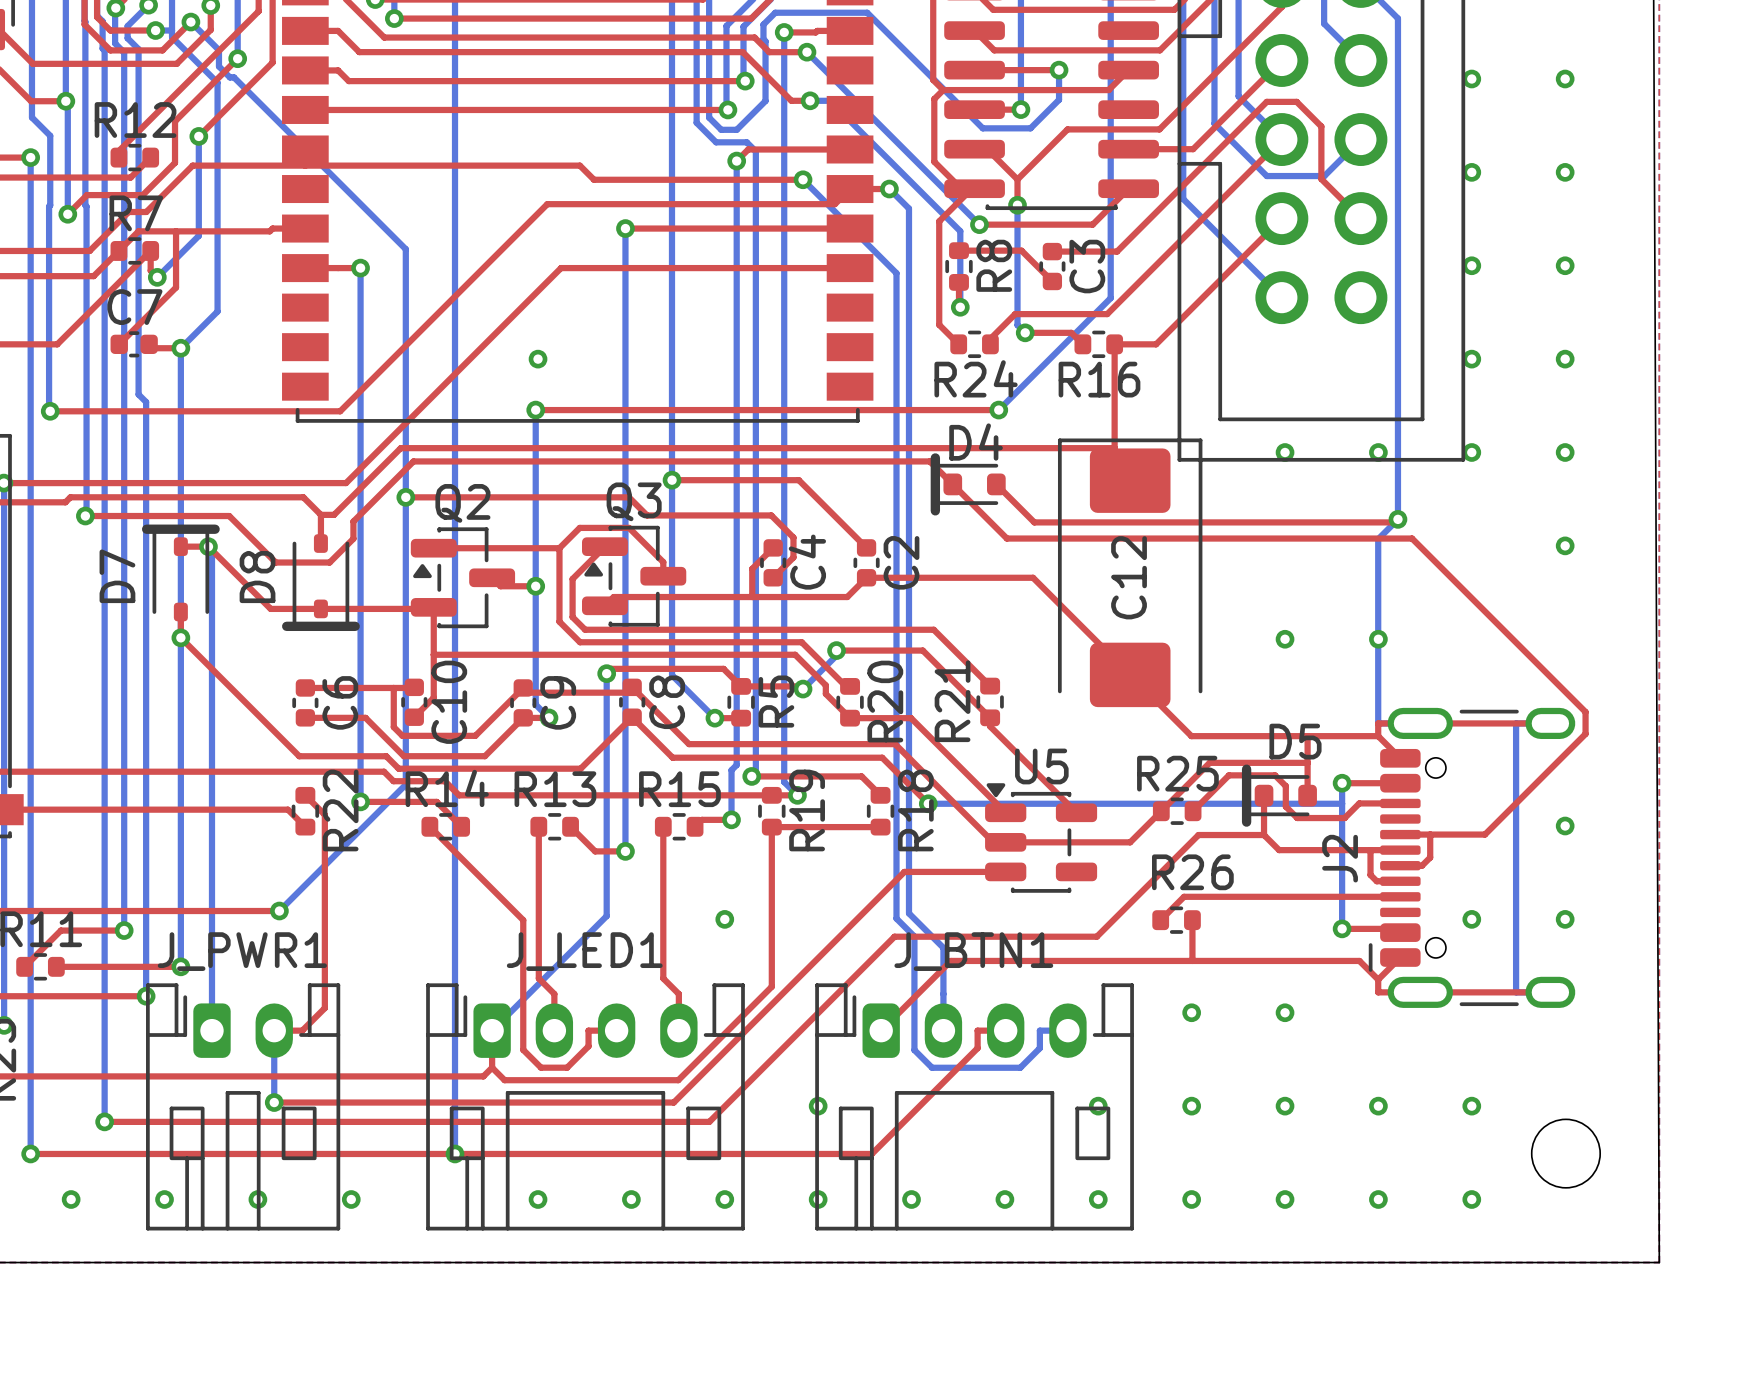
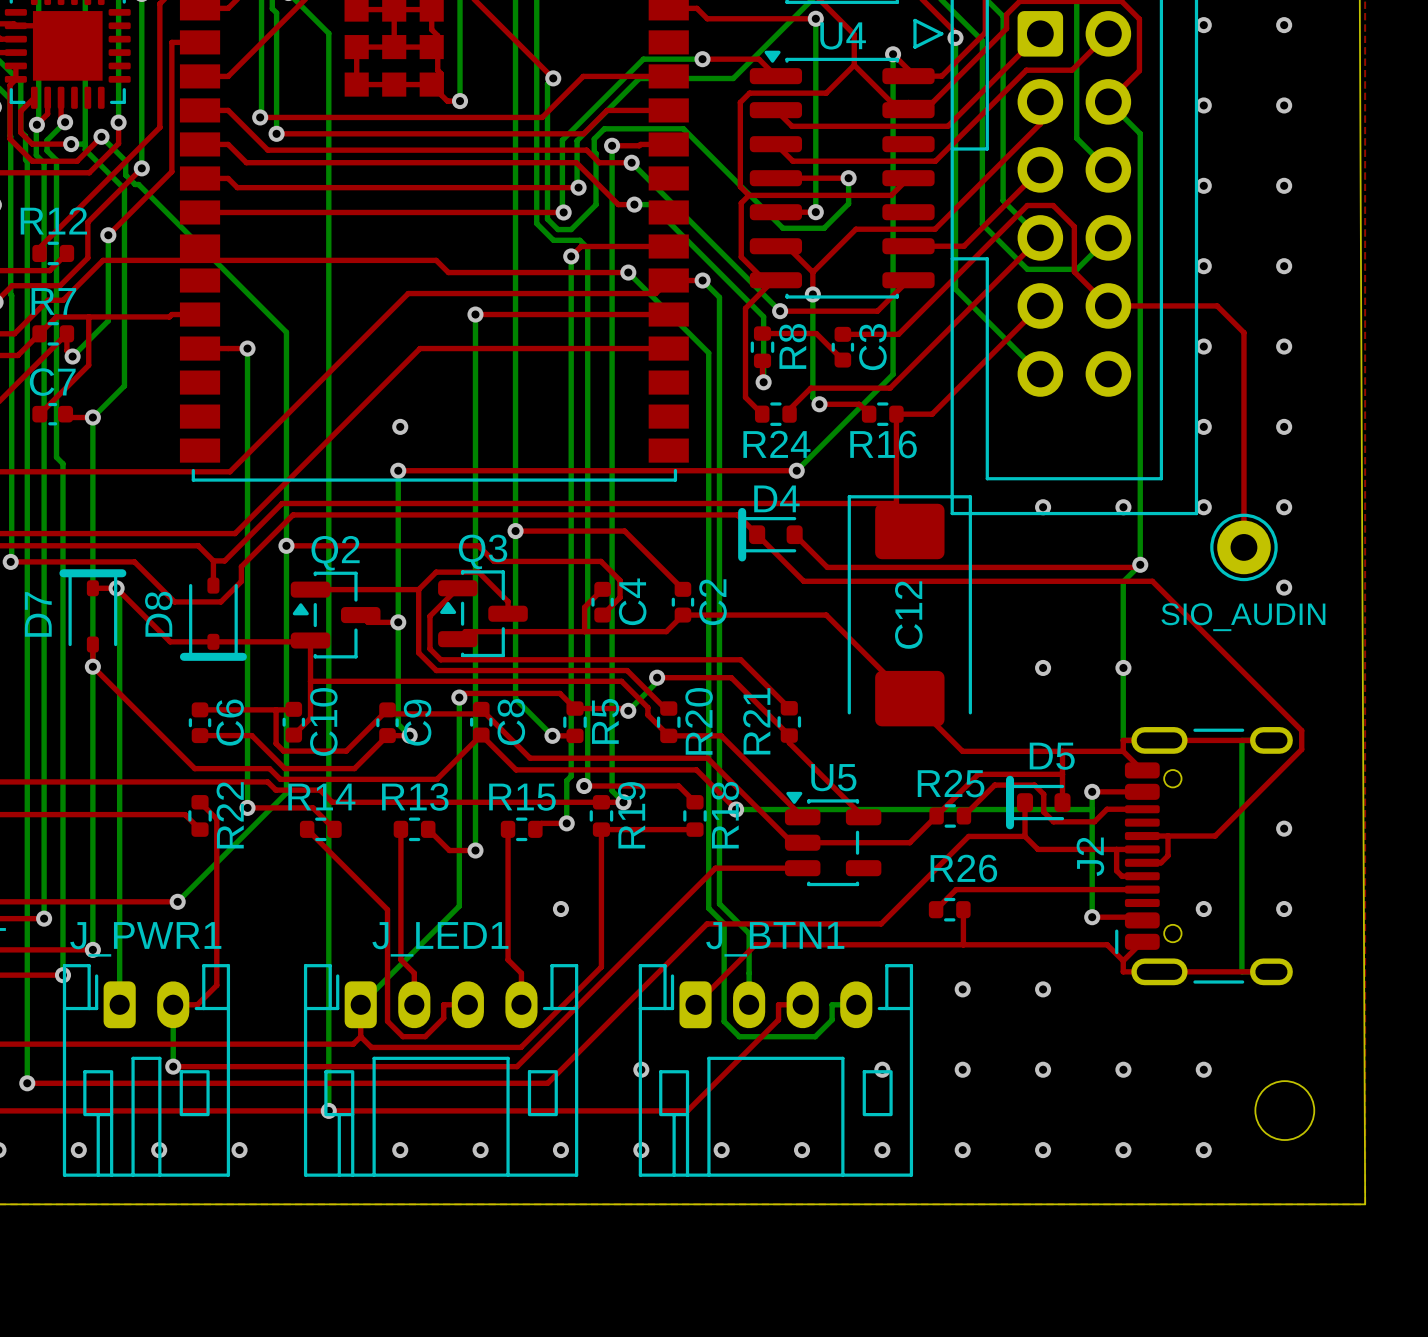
top track: none -> (1108, 305) (1217, 305) (1243, 332) (1243, 547)
part: none -> SIO_AUDIN (1243, 547)

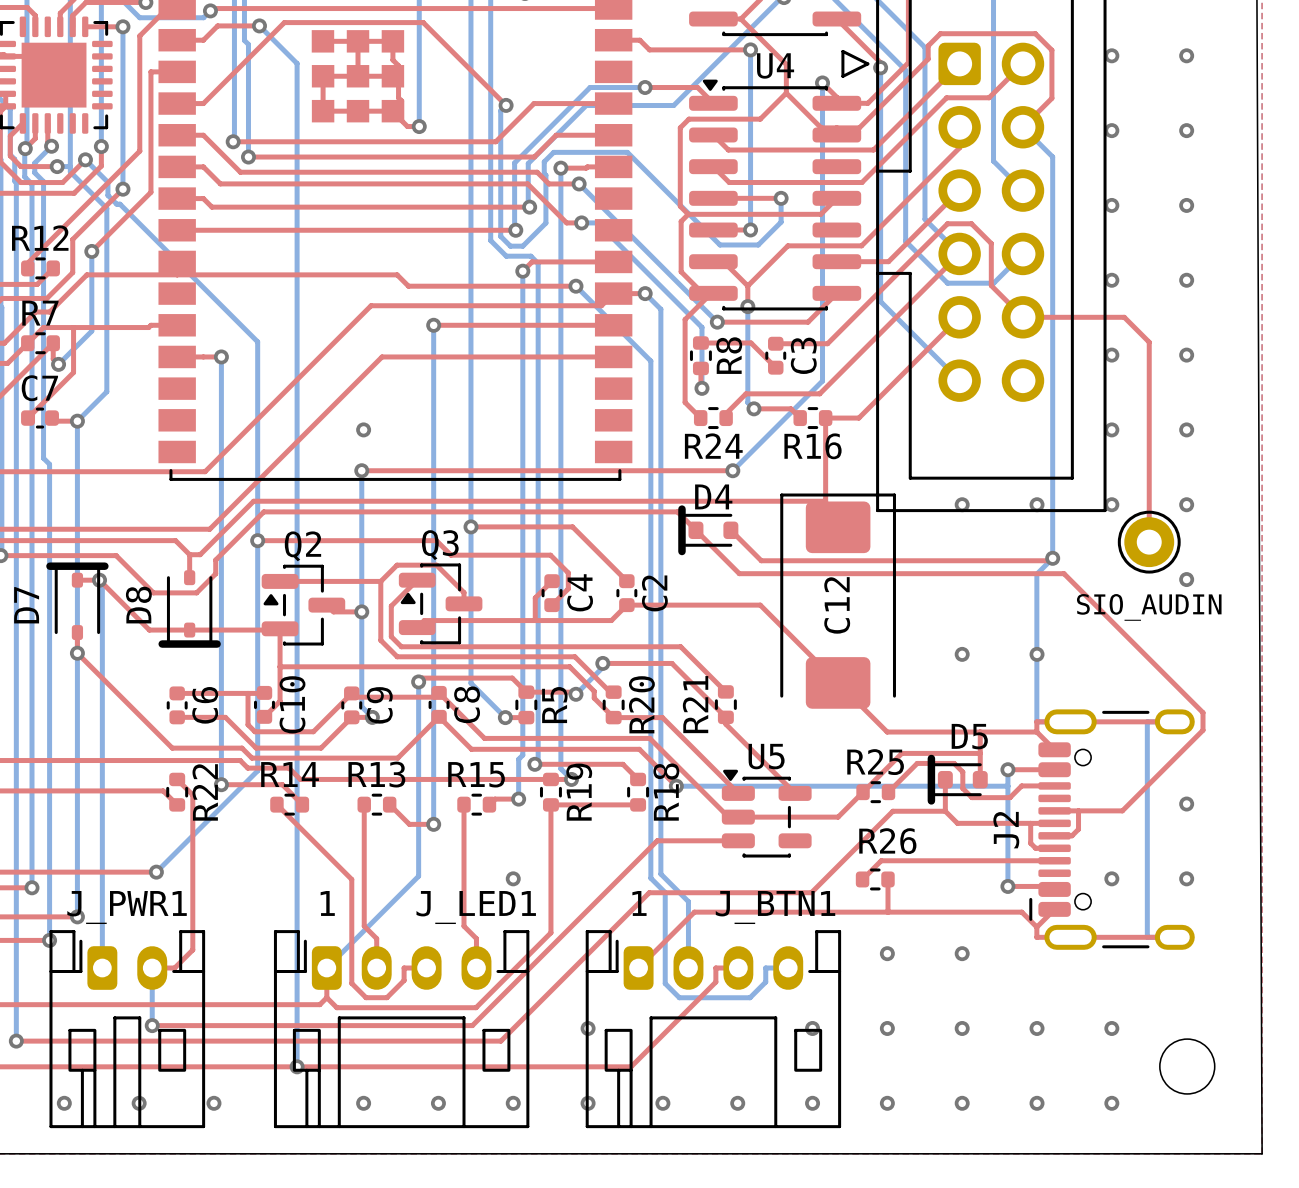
text: none -> 1 (327, 903)
text: none -> 1 (639, 903)
J_LED1 name position: J_LED1 (440, 939) -> J_LED1 (476, 907)
J_BTN1 name position: J_BTN1 (775, 939) -> J_BTN1 (775, 907)

